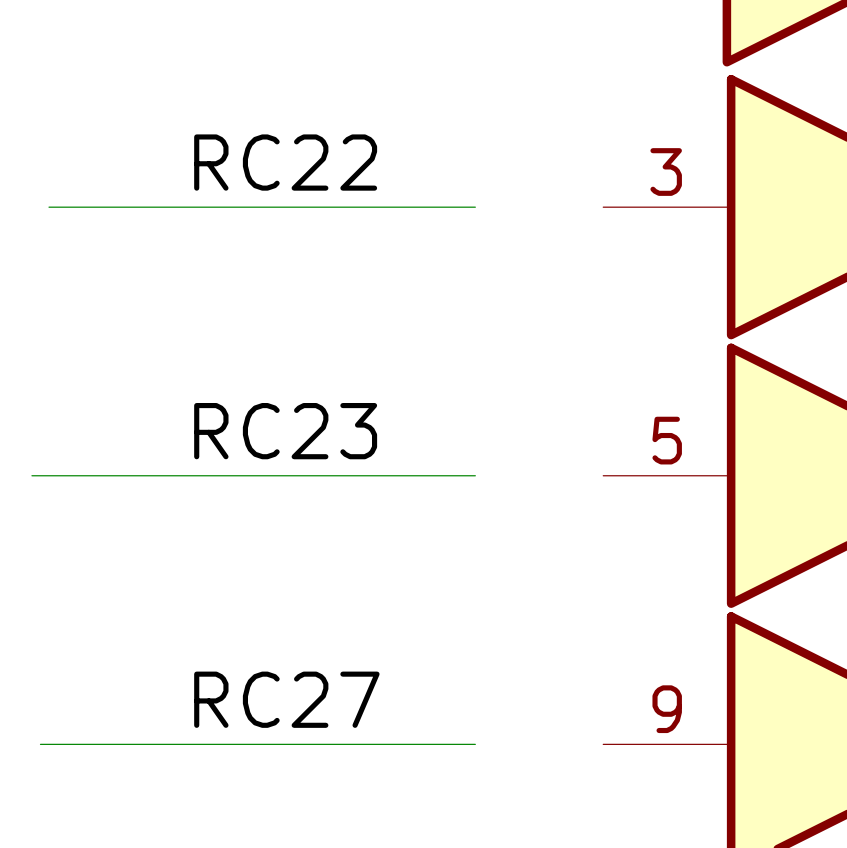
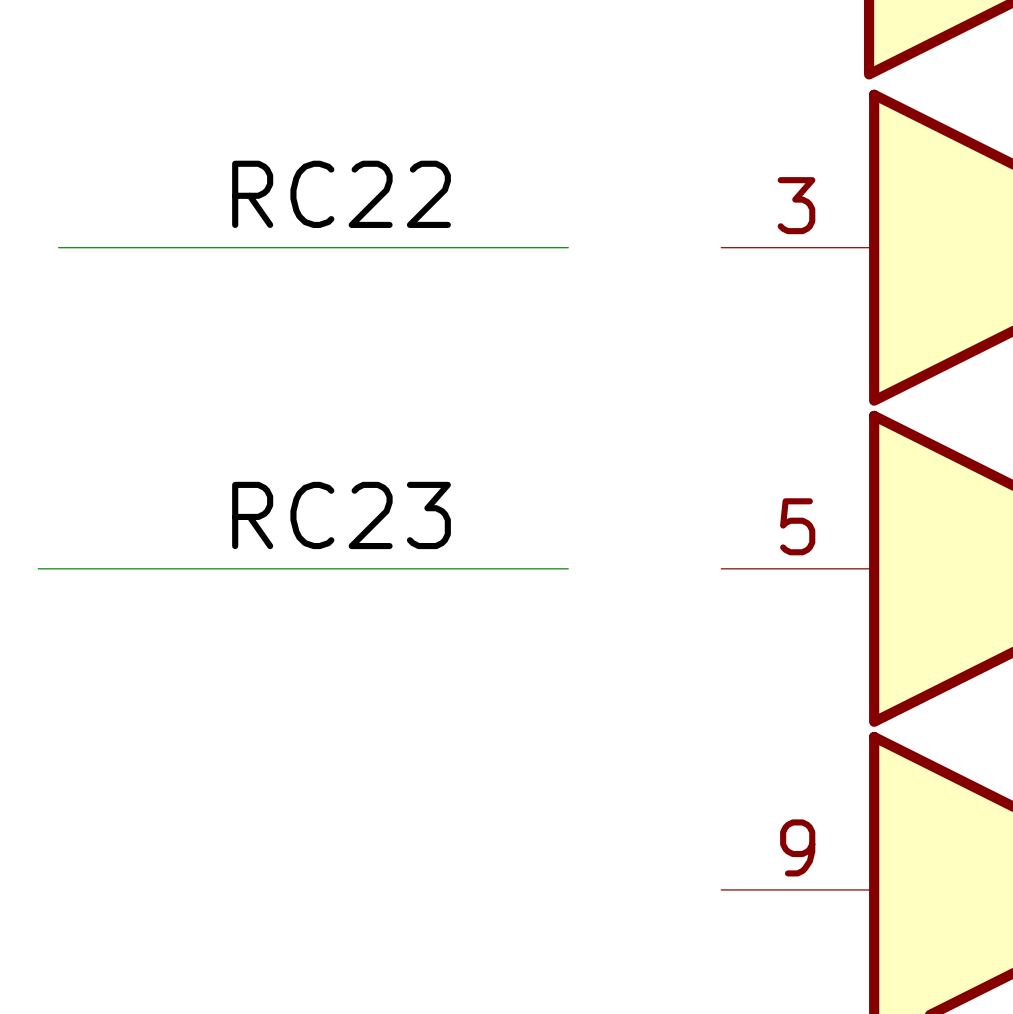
label: RC27 (286, 699) -> none
wire: (40, 744) (475, 744) -> none

